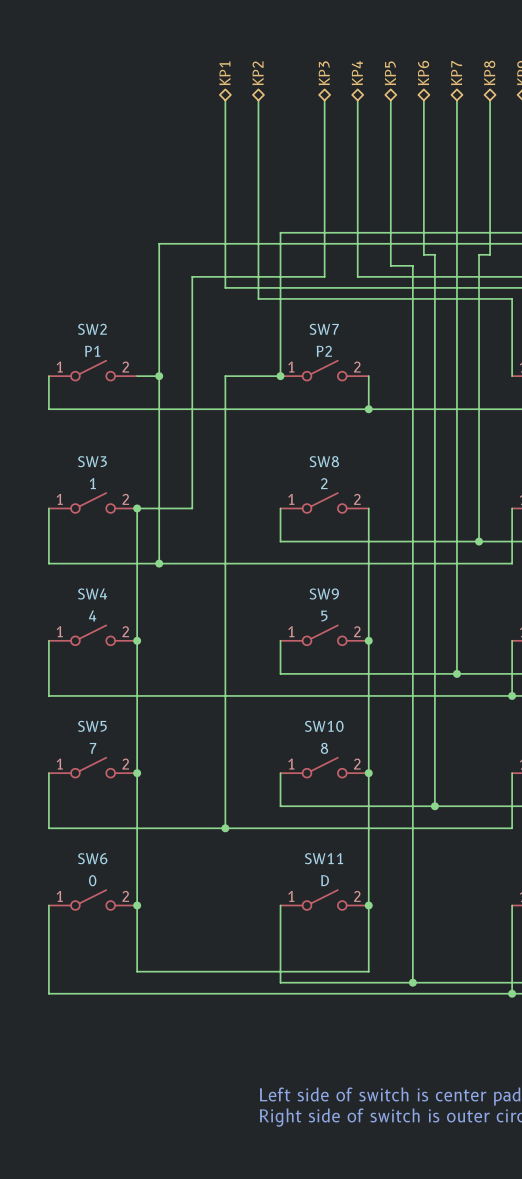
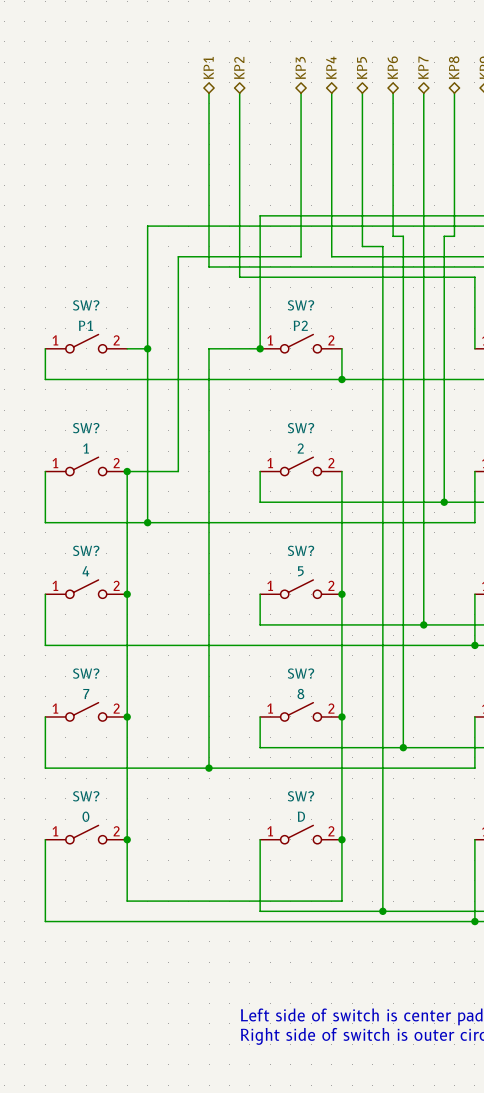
SW2 name: SW2 (92, 329) -> SW? (86, 305)
SW7 name: SW7 (324, 329) -> SW? (300, 305)
SW3 name: SW3 (92, 461) -> SW? (86, 428)
SW8 name: SW8 (324, 461) -> SW? (300, 428)
SW4 name: SW4 (92, 594) -> SW? (86, 550)
SW9 name: SW9 (324, 594) -> SW? (300, 550)
SW5 name: SW5 (92, 726) -> SW? (86, 673)
SW10 name: SW10 (324, 726) -> SW? (300, 673)
SW6 name: SW6 (92, 858) -> SW? (86, 796)
SW11 name: SW11 (324, 858) -> SW? (300, 796)

